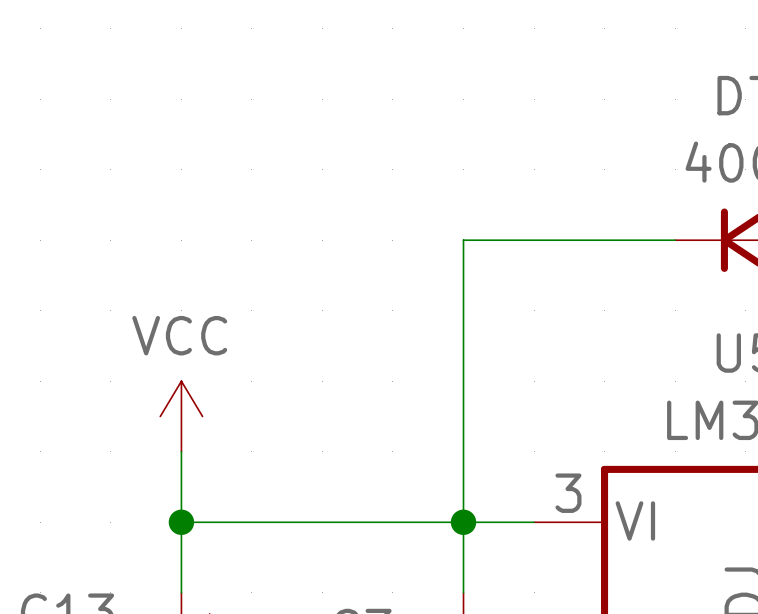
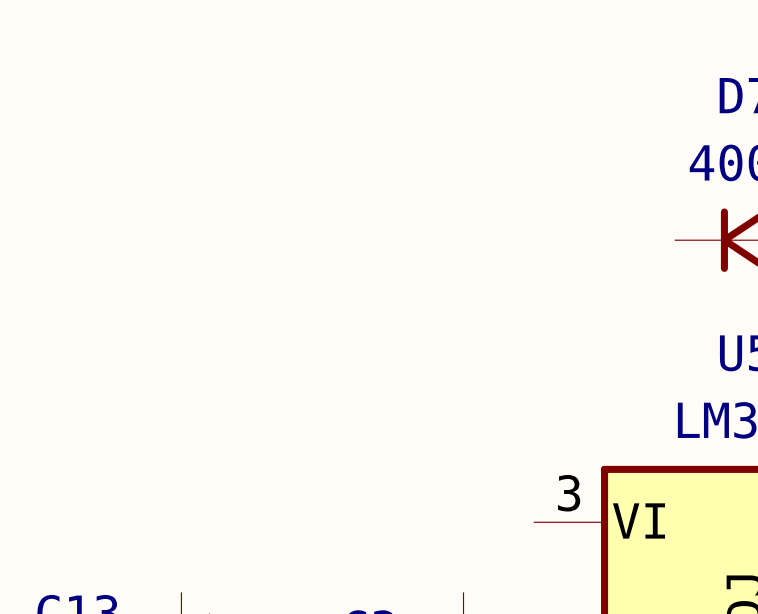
wire: (675, 240) (463, 240) (463, 592) -> none
power symbol: VCC (181, 416) -> none
wire: (181, 451) (181, 592) -> none
wire: (181, 522) (534, 522) -> none
junction: (181, 522) -> none
junction: (463, 522) -> none

